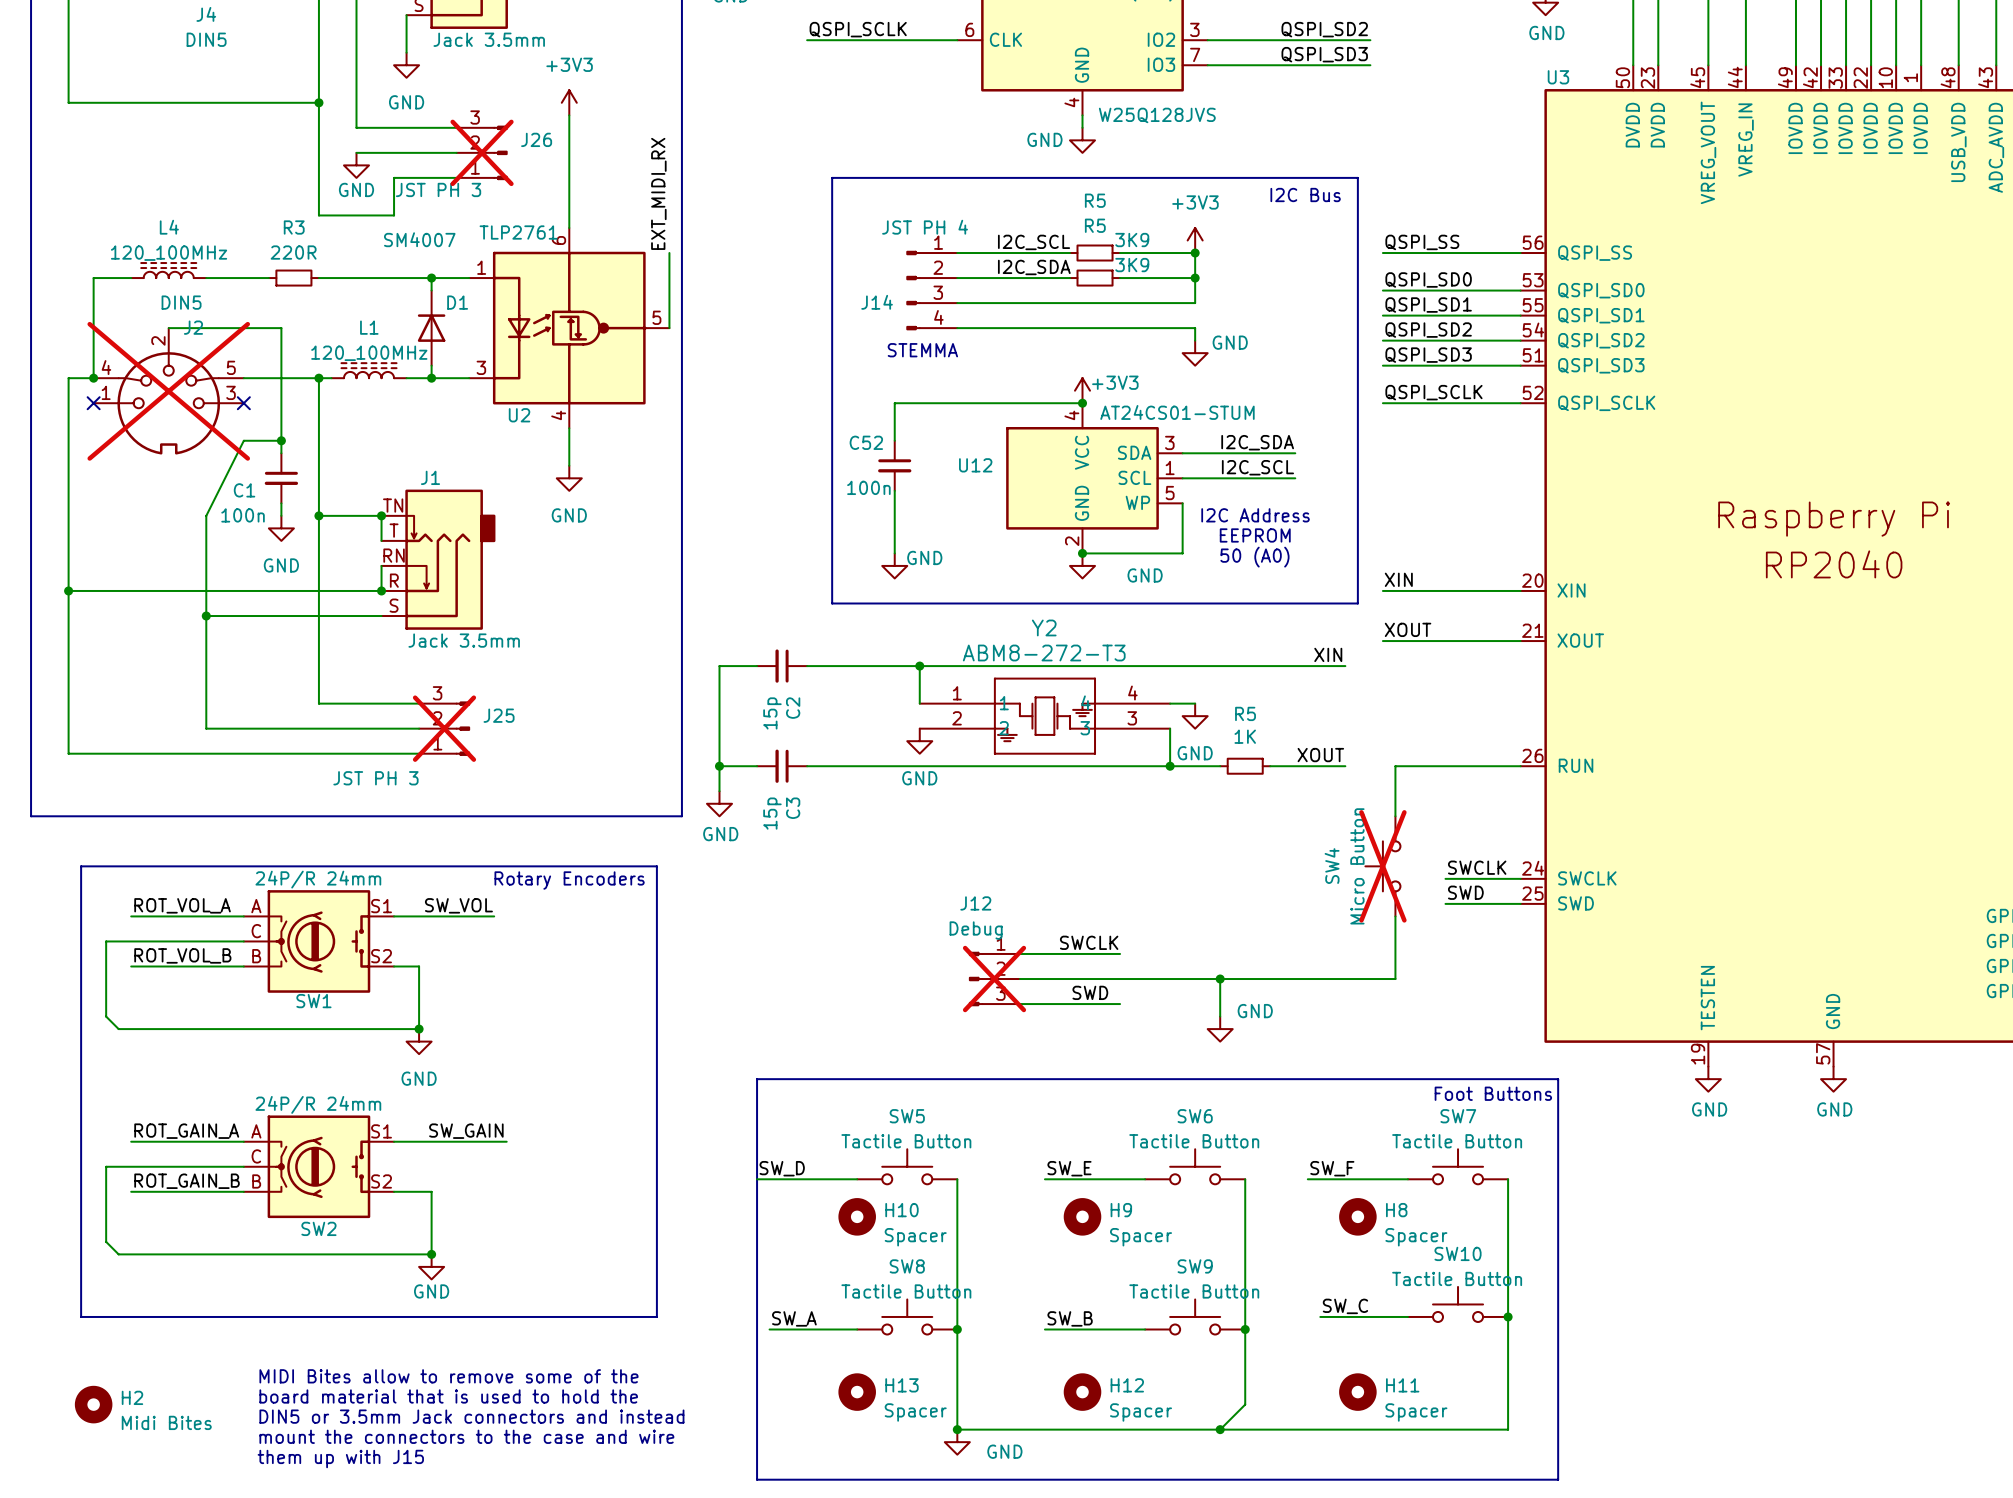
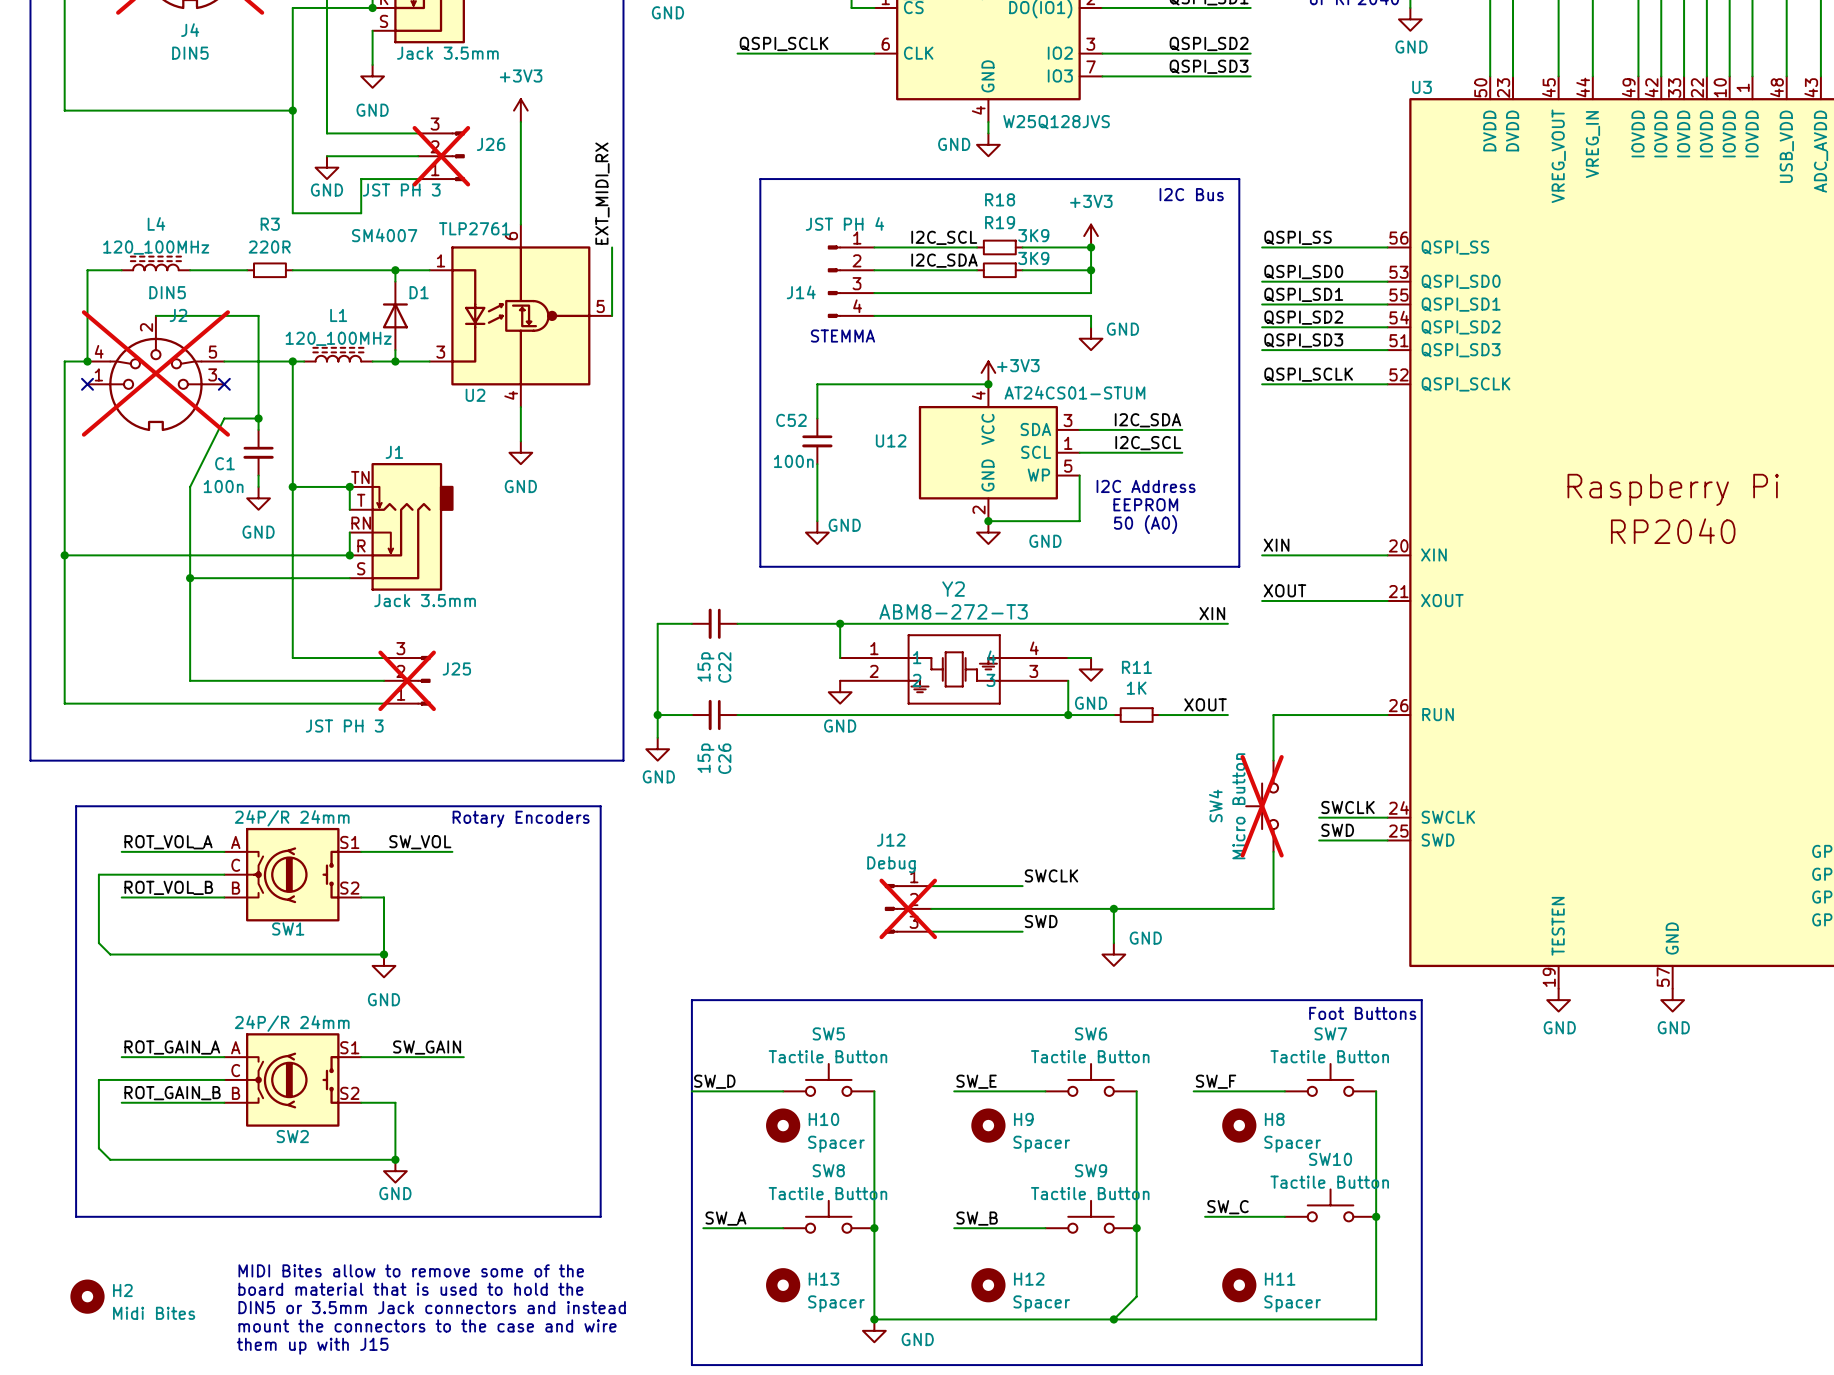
R5 name: R5 (1095, 200) -> R18 (1000, 199)
R5 name: R5 (1095, 225) -> R19 (1000, 222)
C2 name: C2 (793, 708) -> C22 (724, 667)
R5 name: R5 (1245, 713) -> R11 (1136, 667)
C3 name: C3 (793, 808) -> C26 (724, 758)
label position: SWCLK (1089, 942) -> SWCLK (1051, 875)
label position: SWD (1090, 992) -> SWD (1041, 921)

